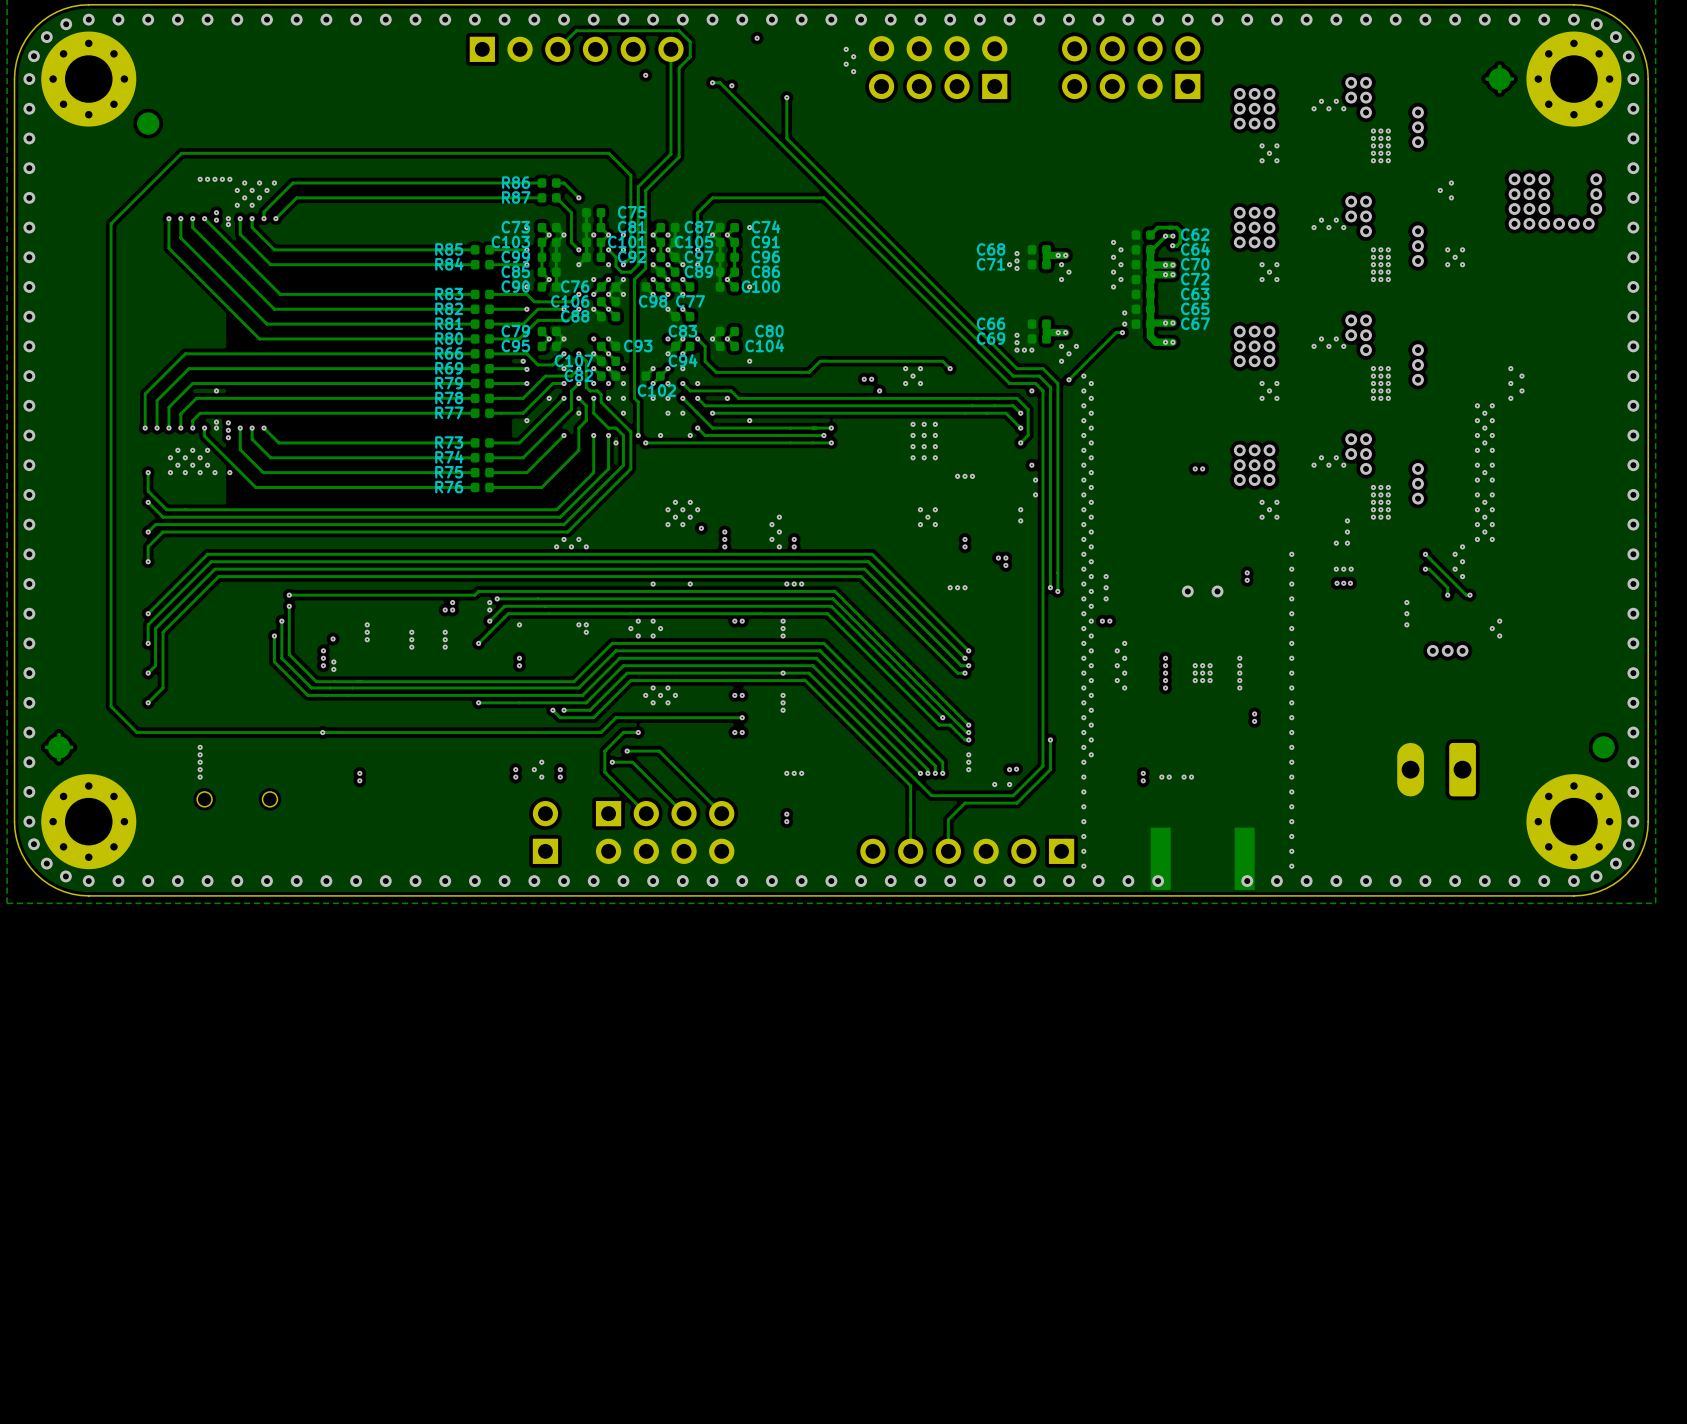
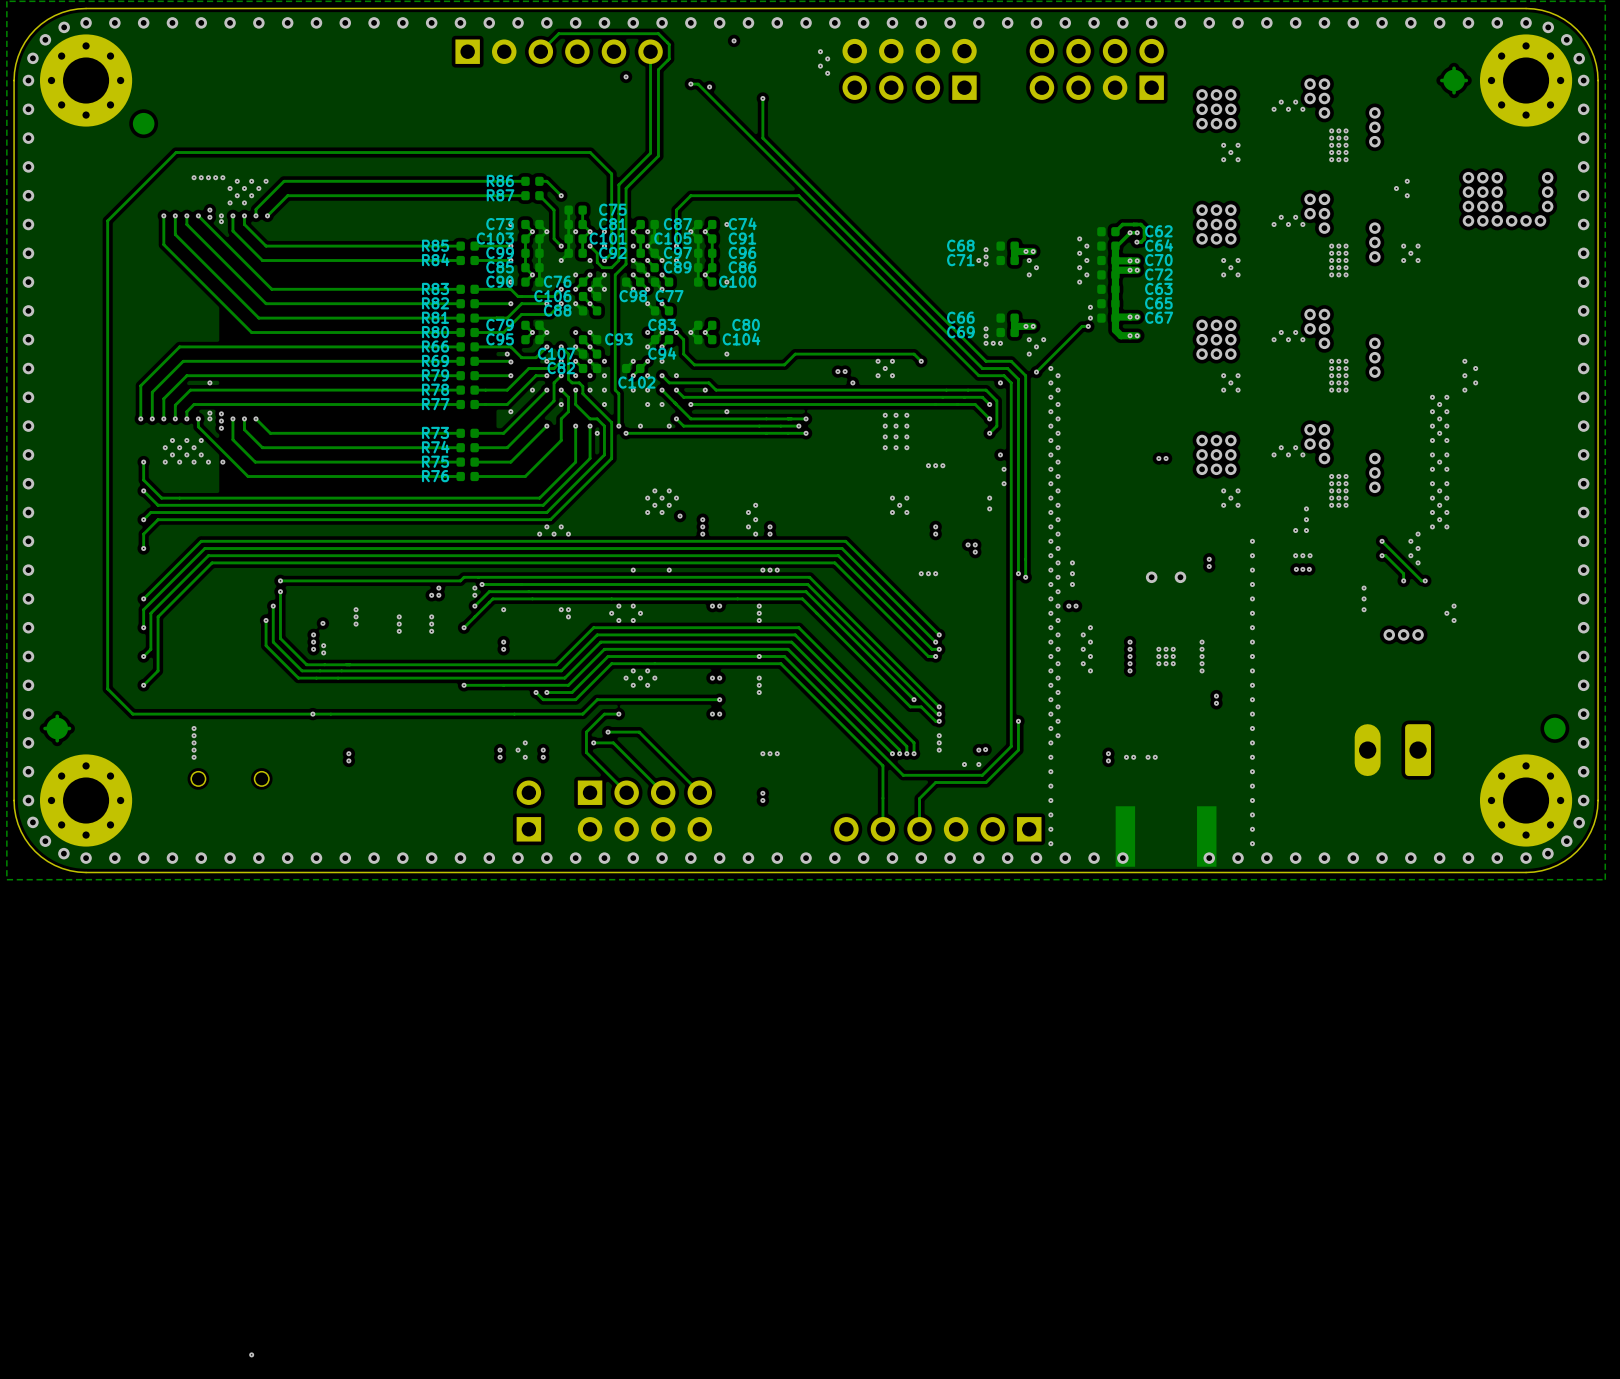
via: none -> (251, 1354)

